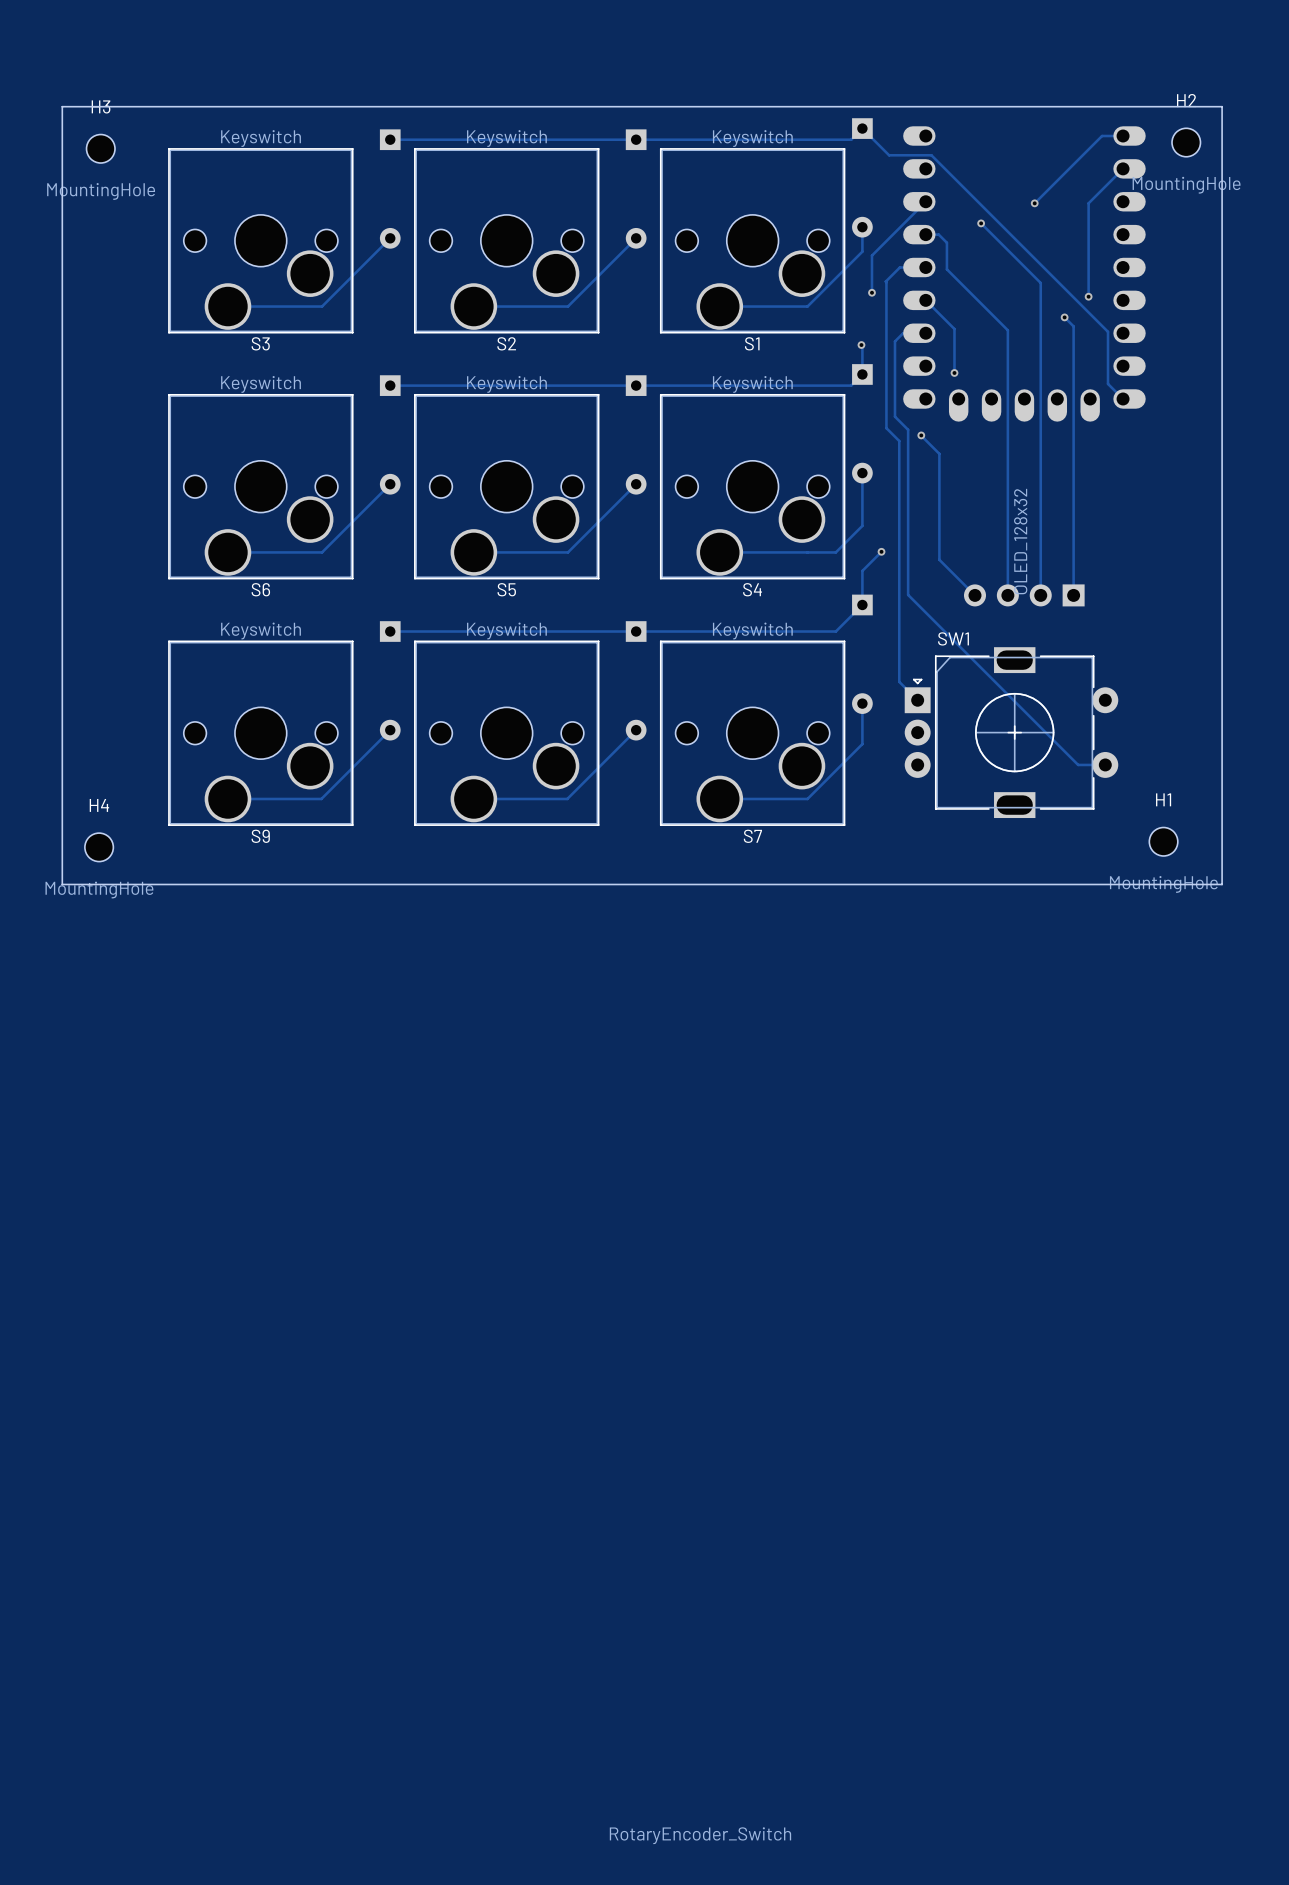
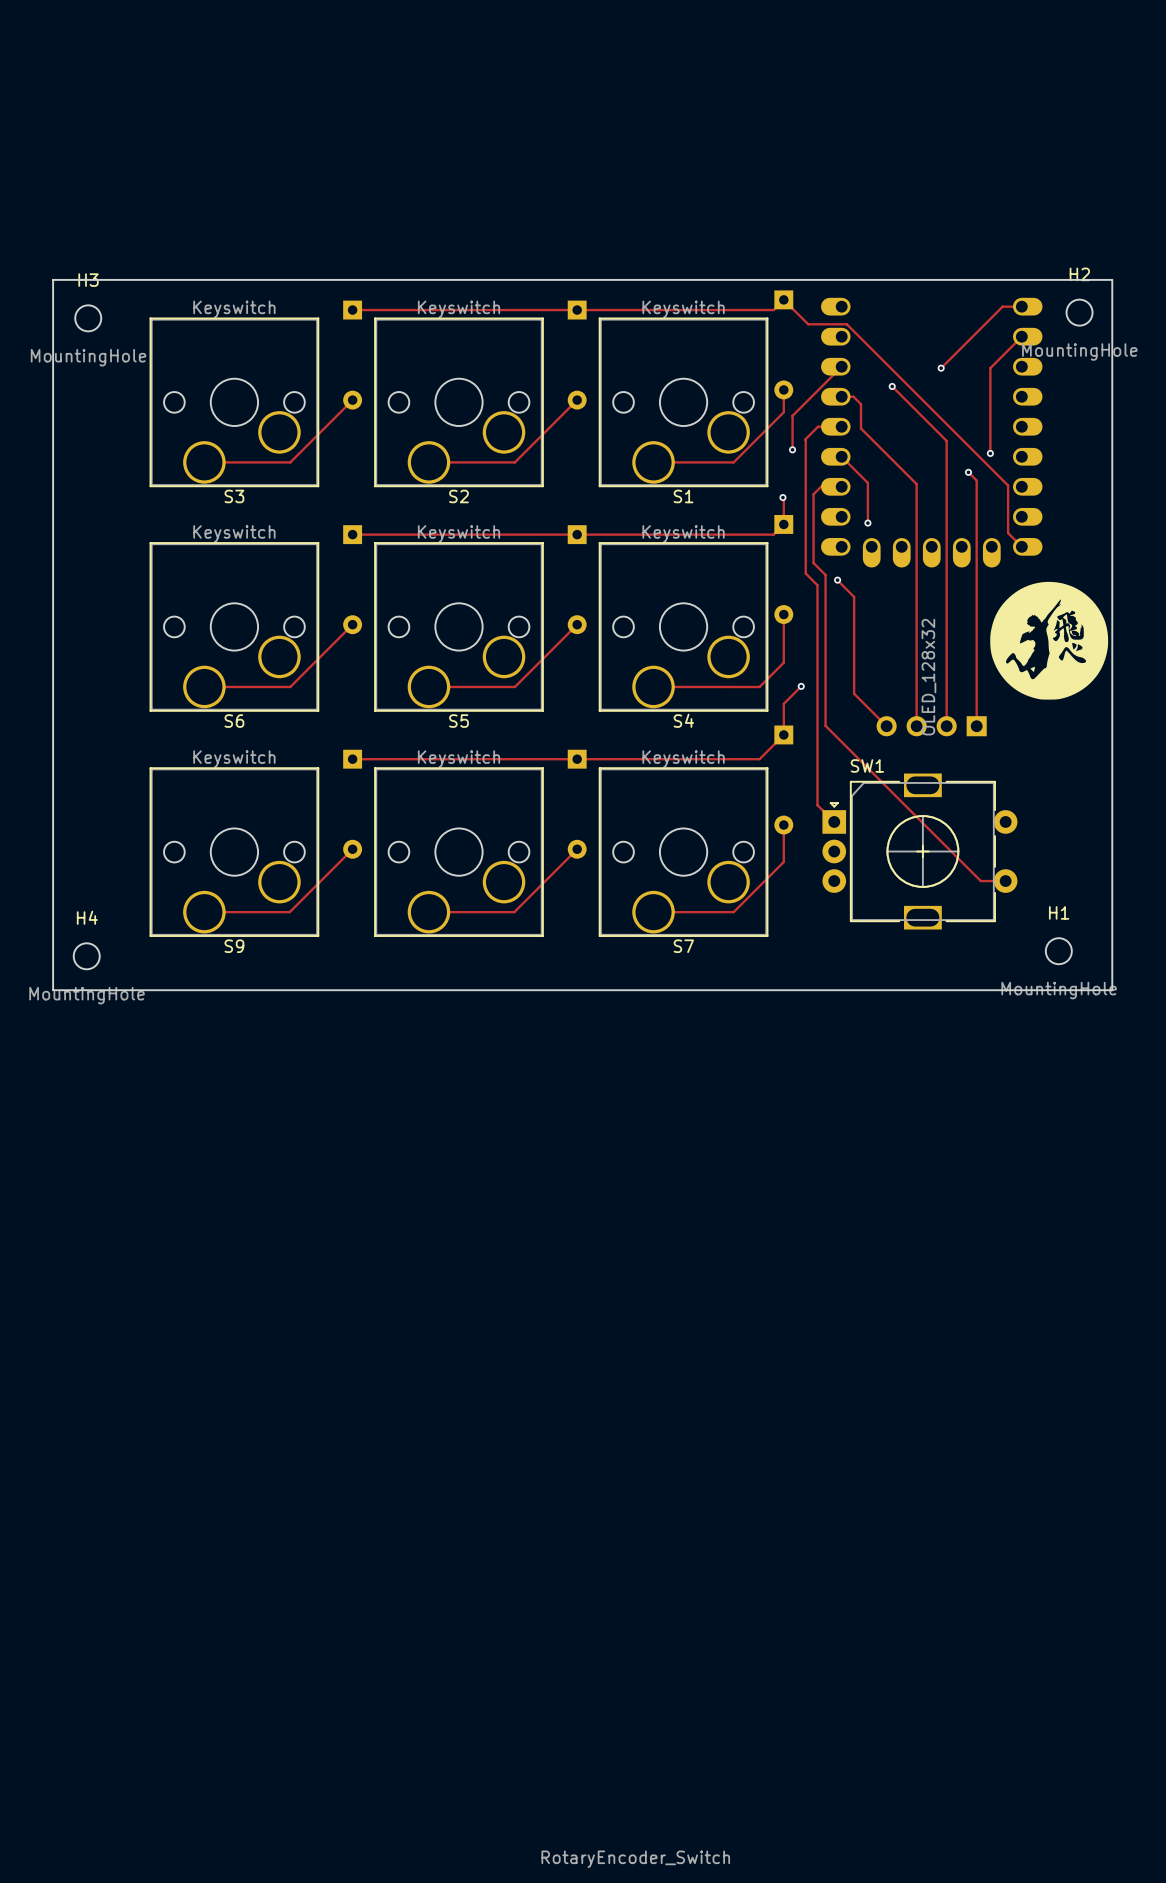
drawing: none -> [990, 581, 1109, 700]

